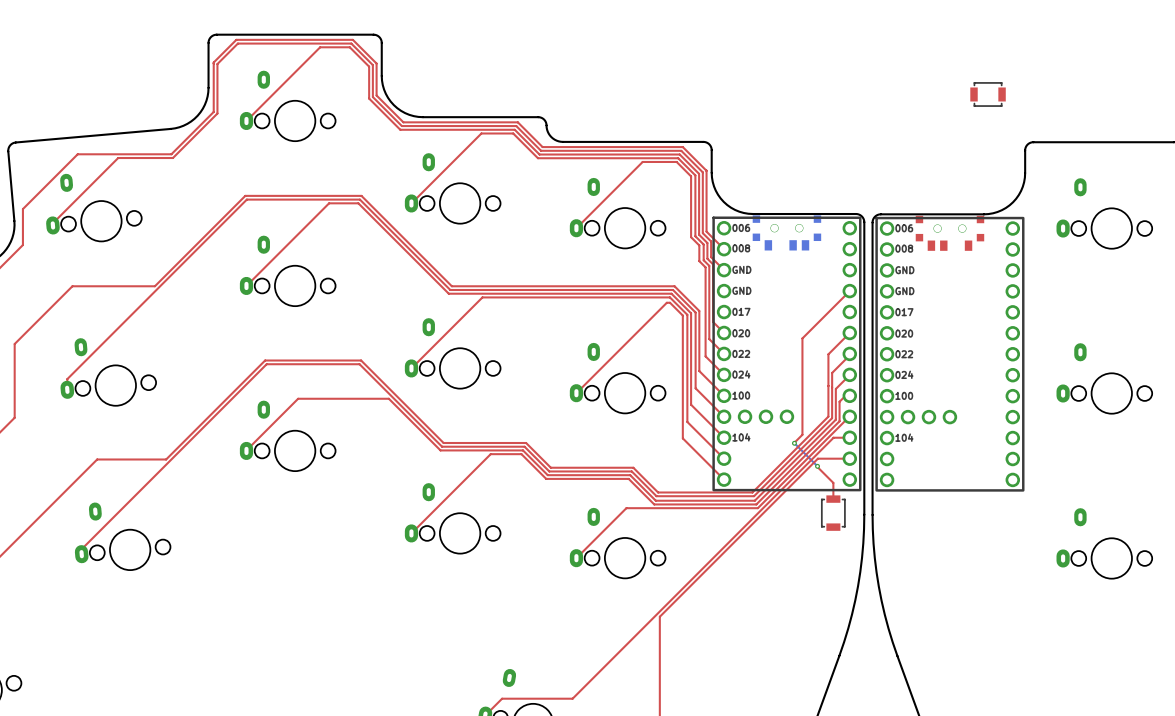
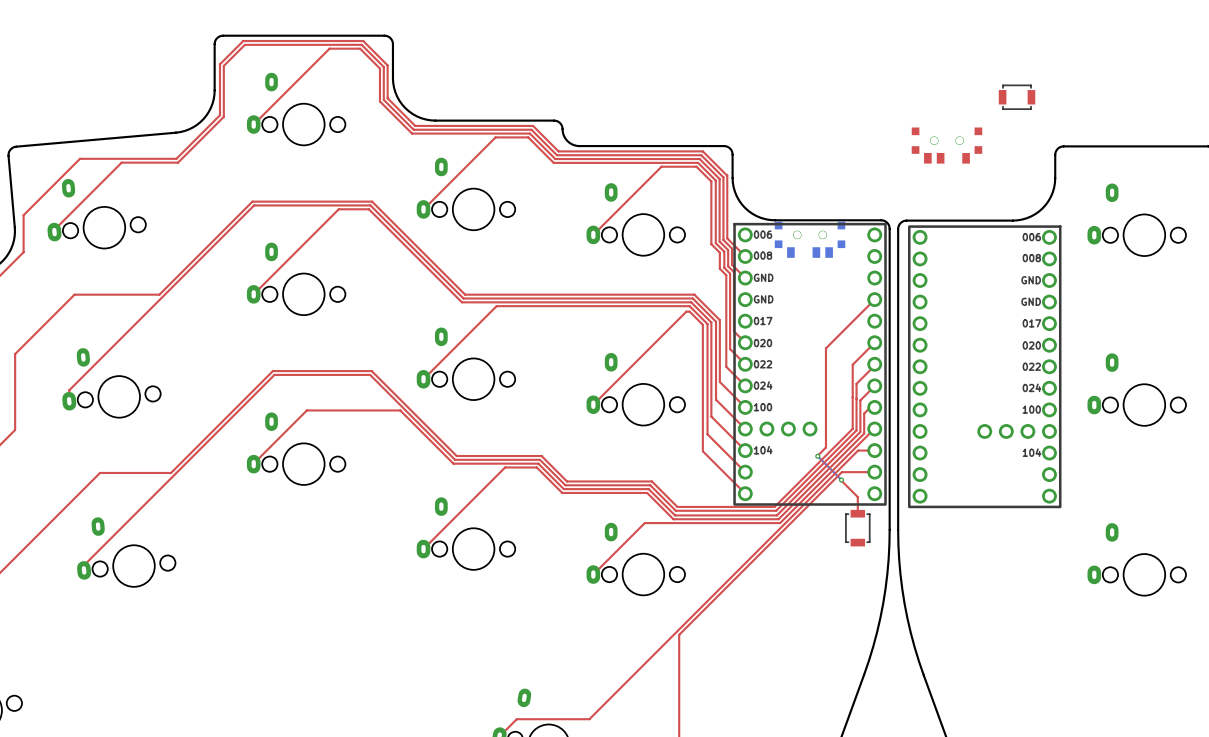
part position: (949, 233) -> (946, 145)
part side: top (949, 354) -> bottom (984, 366)

